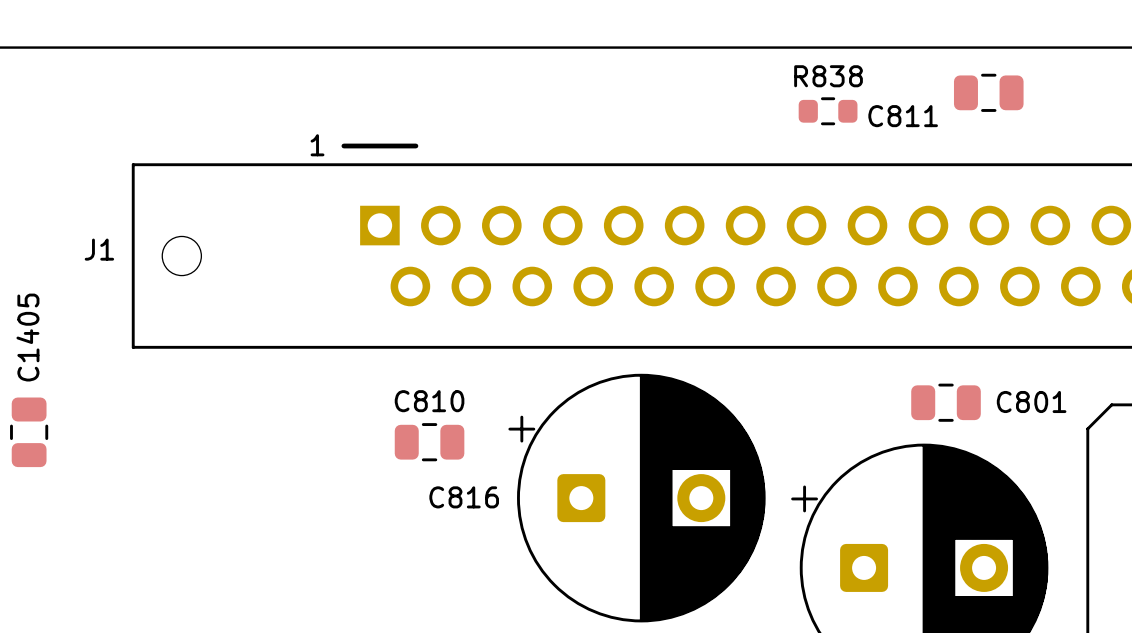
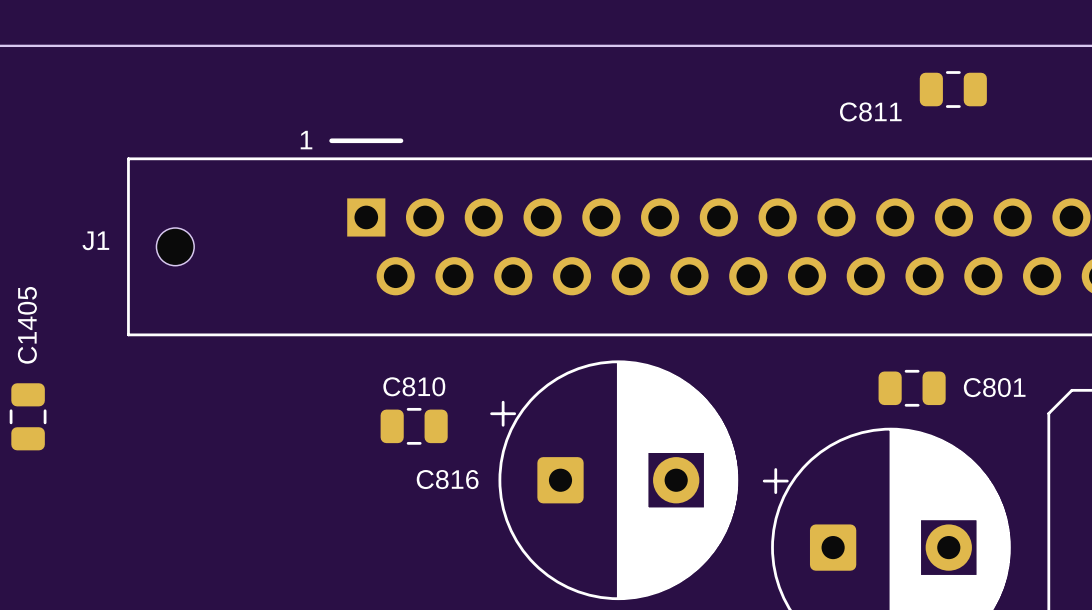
R838: (828, 111) -> none

